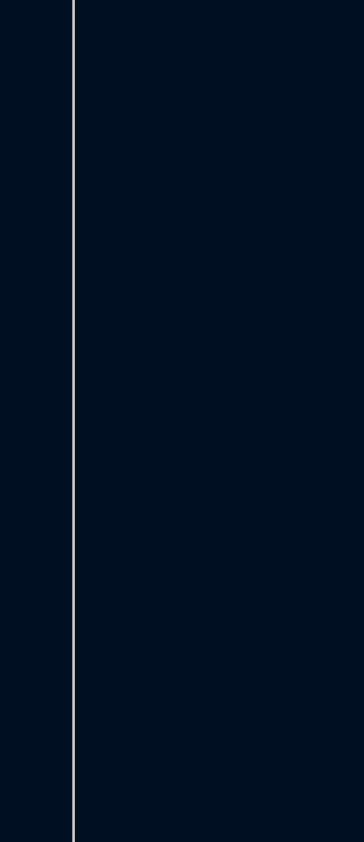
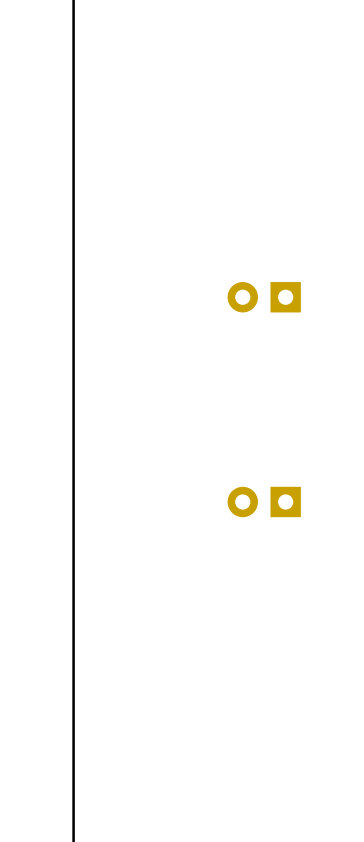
part: none -> (264, 297)
part: none -> (264, 501)

